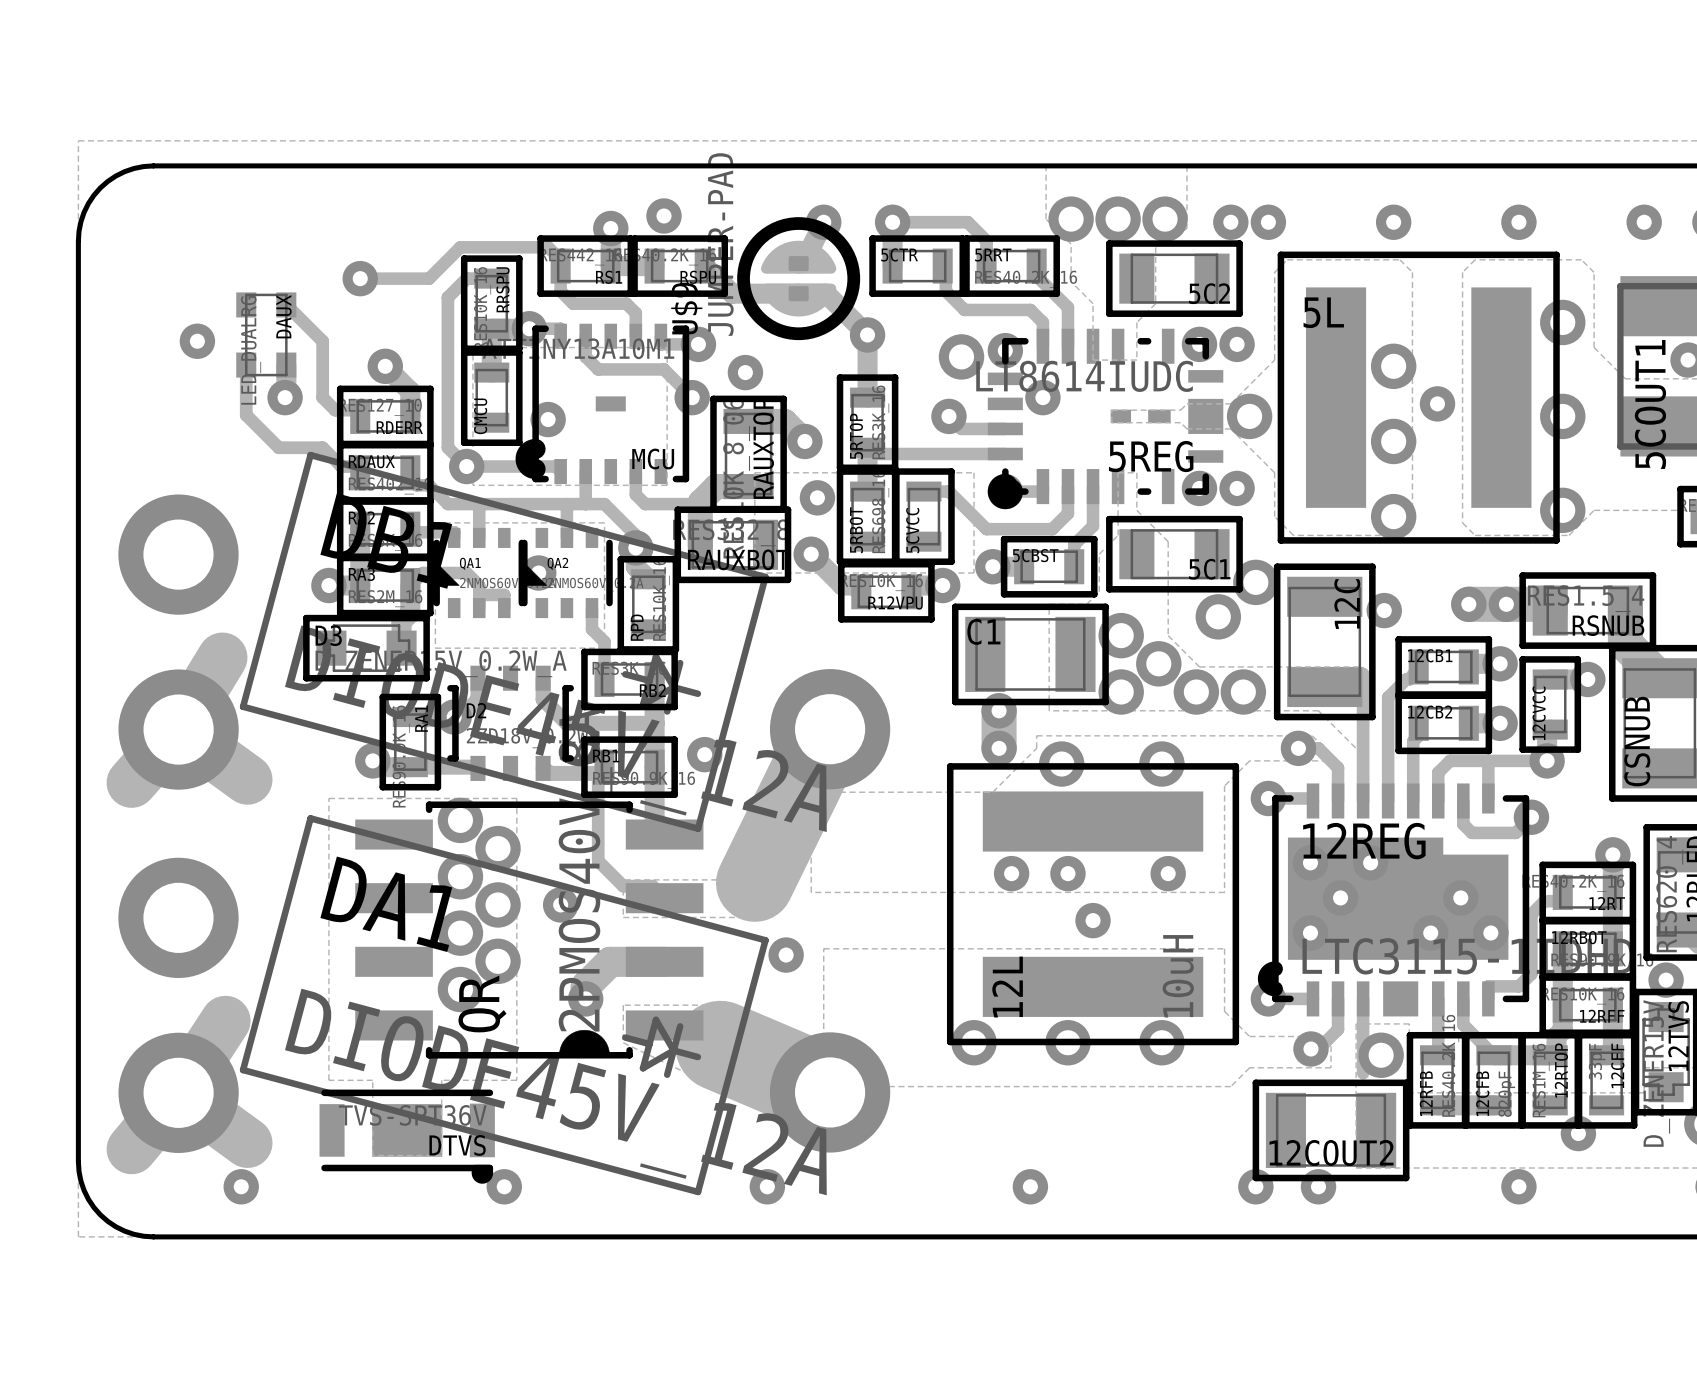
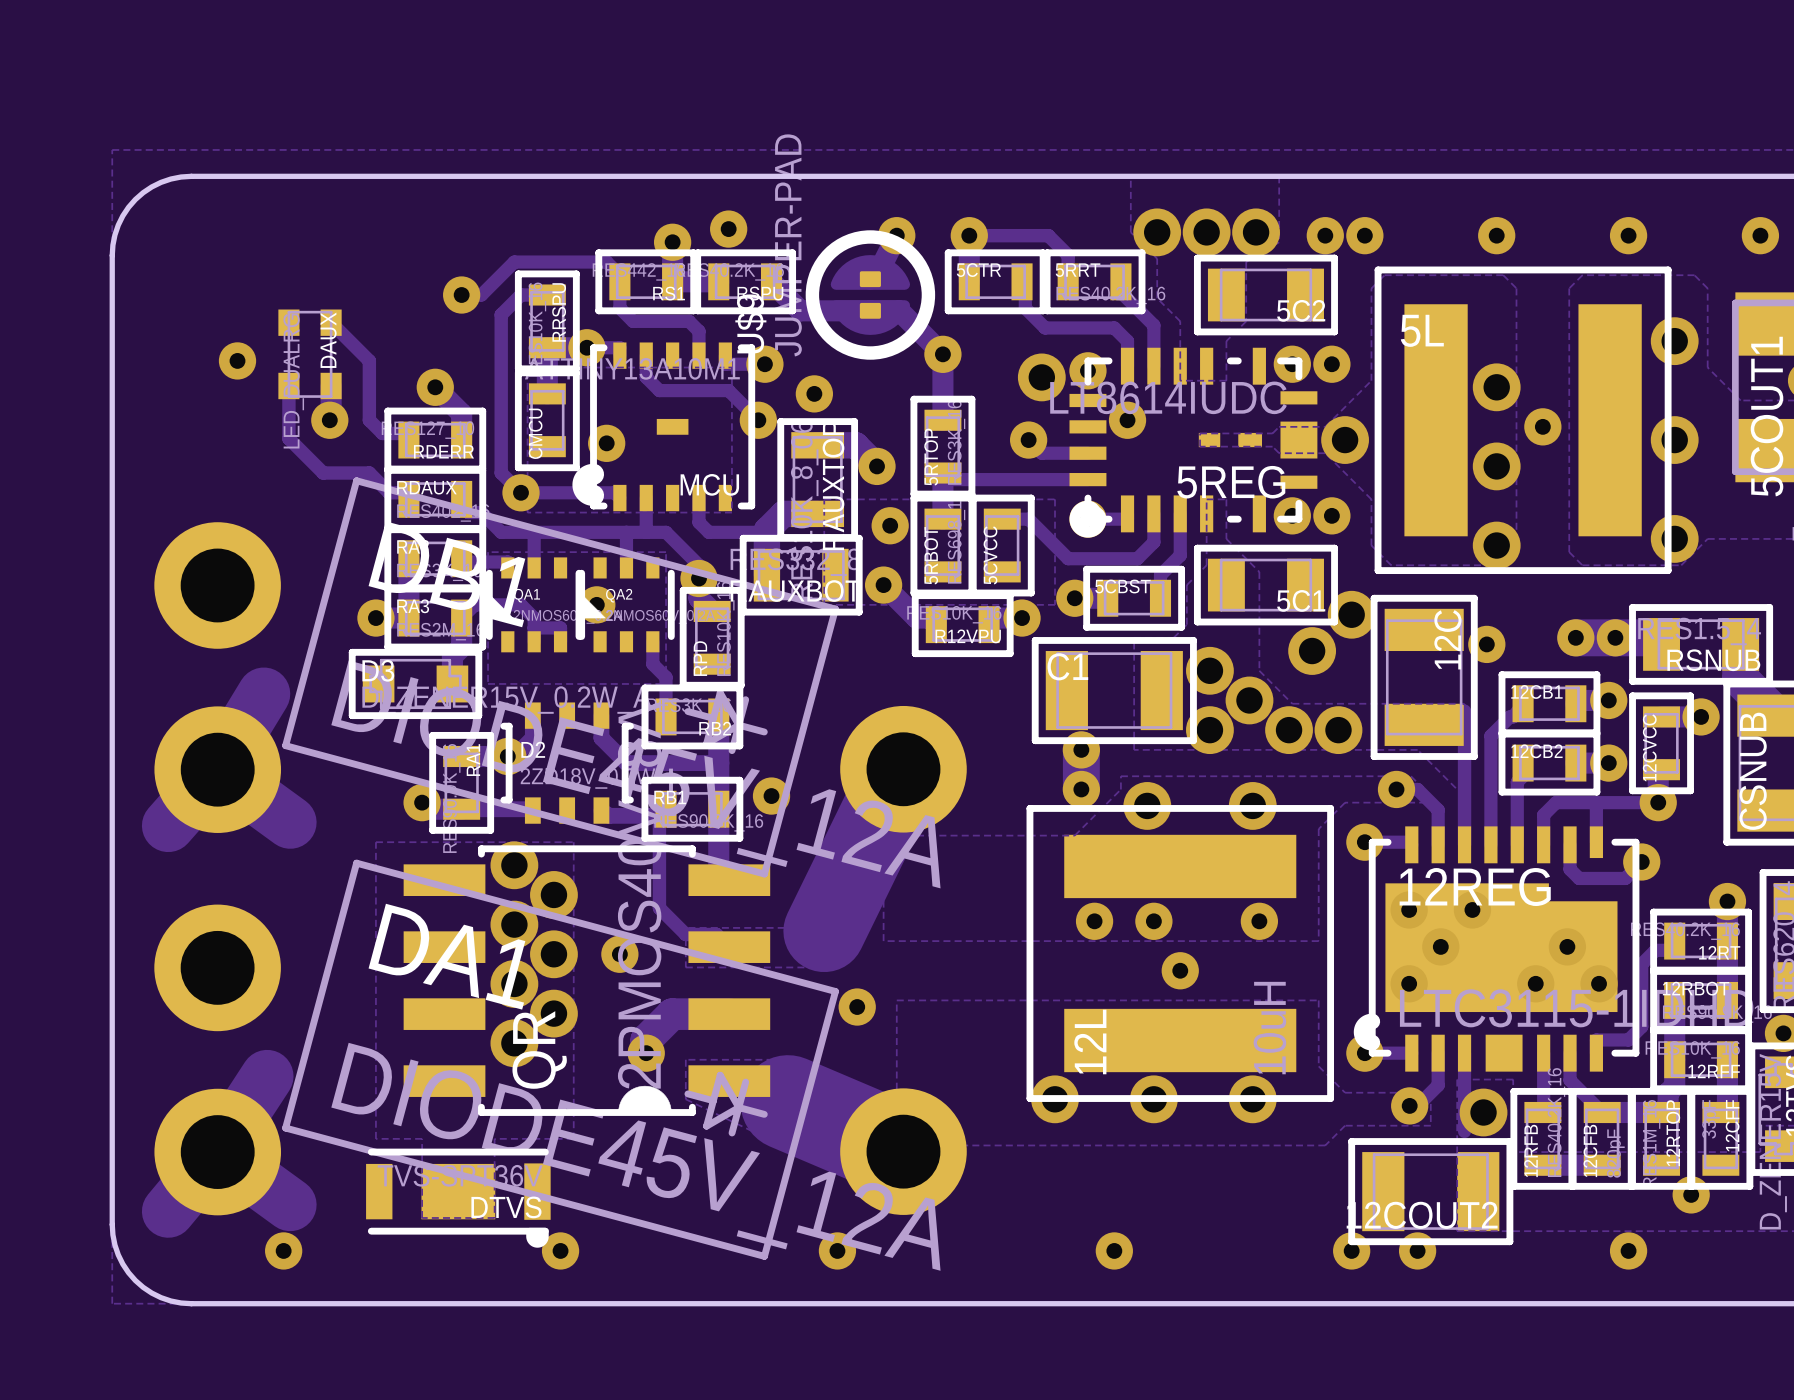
track: (360, 278) (410, 278) -> none
via position: (360, 278) -> (461, 295)

